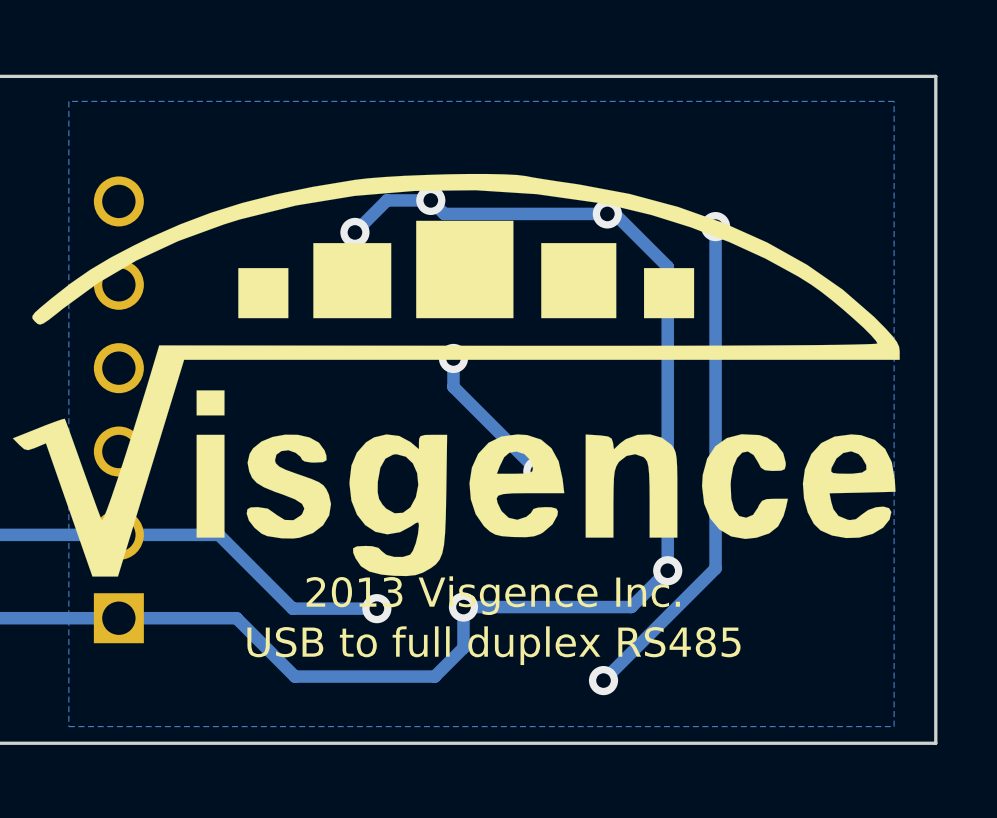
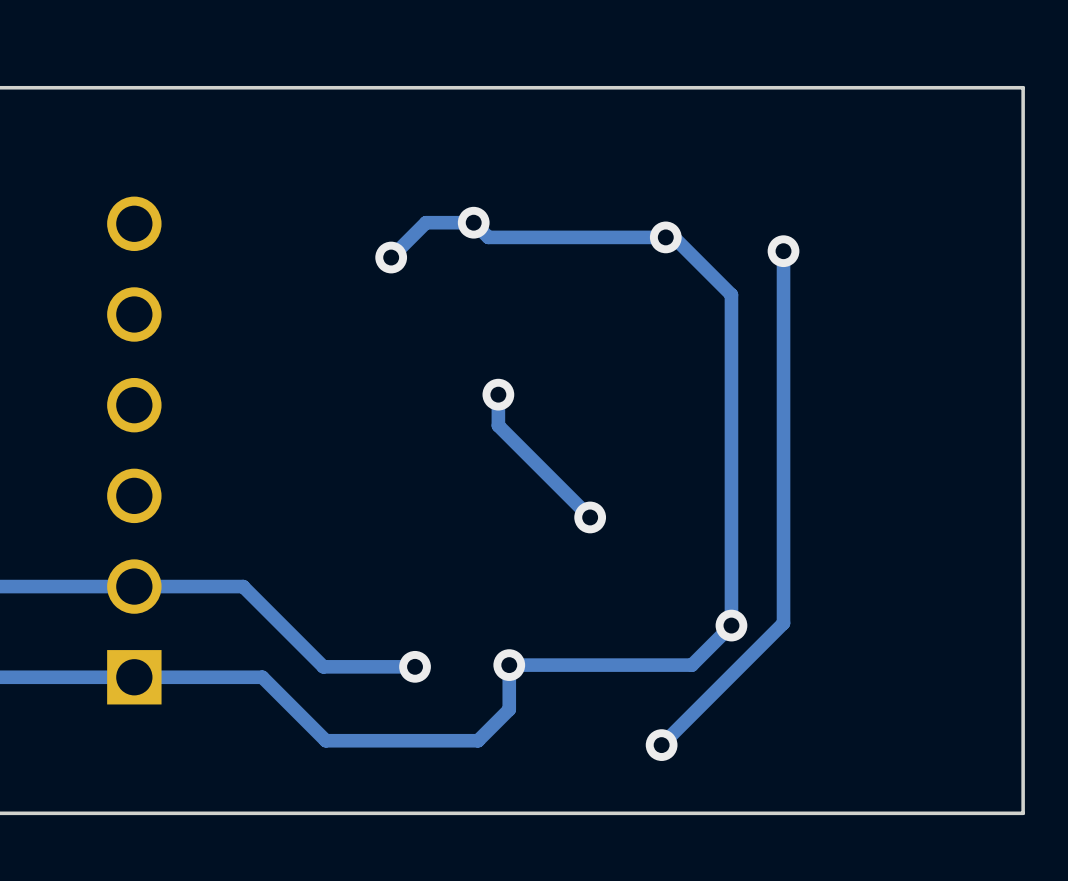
zone outline: (894, 101) (894, 726) (68, 726) (68, 101) (894, 101) -> none
drawing: [12, 173, 900, 577] -> none
text: 2013 Visgence Inc. (493, 595) -> none
text: USB to full duplex RS485 (493, 645) -> none

